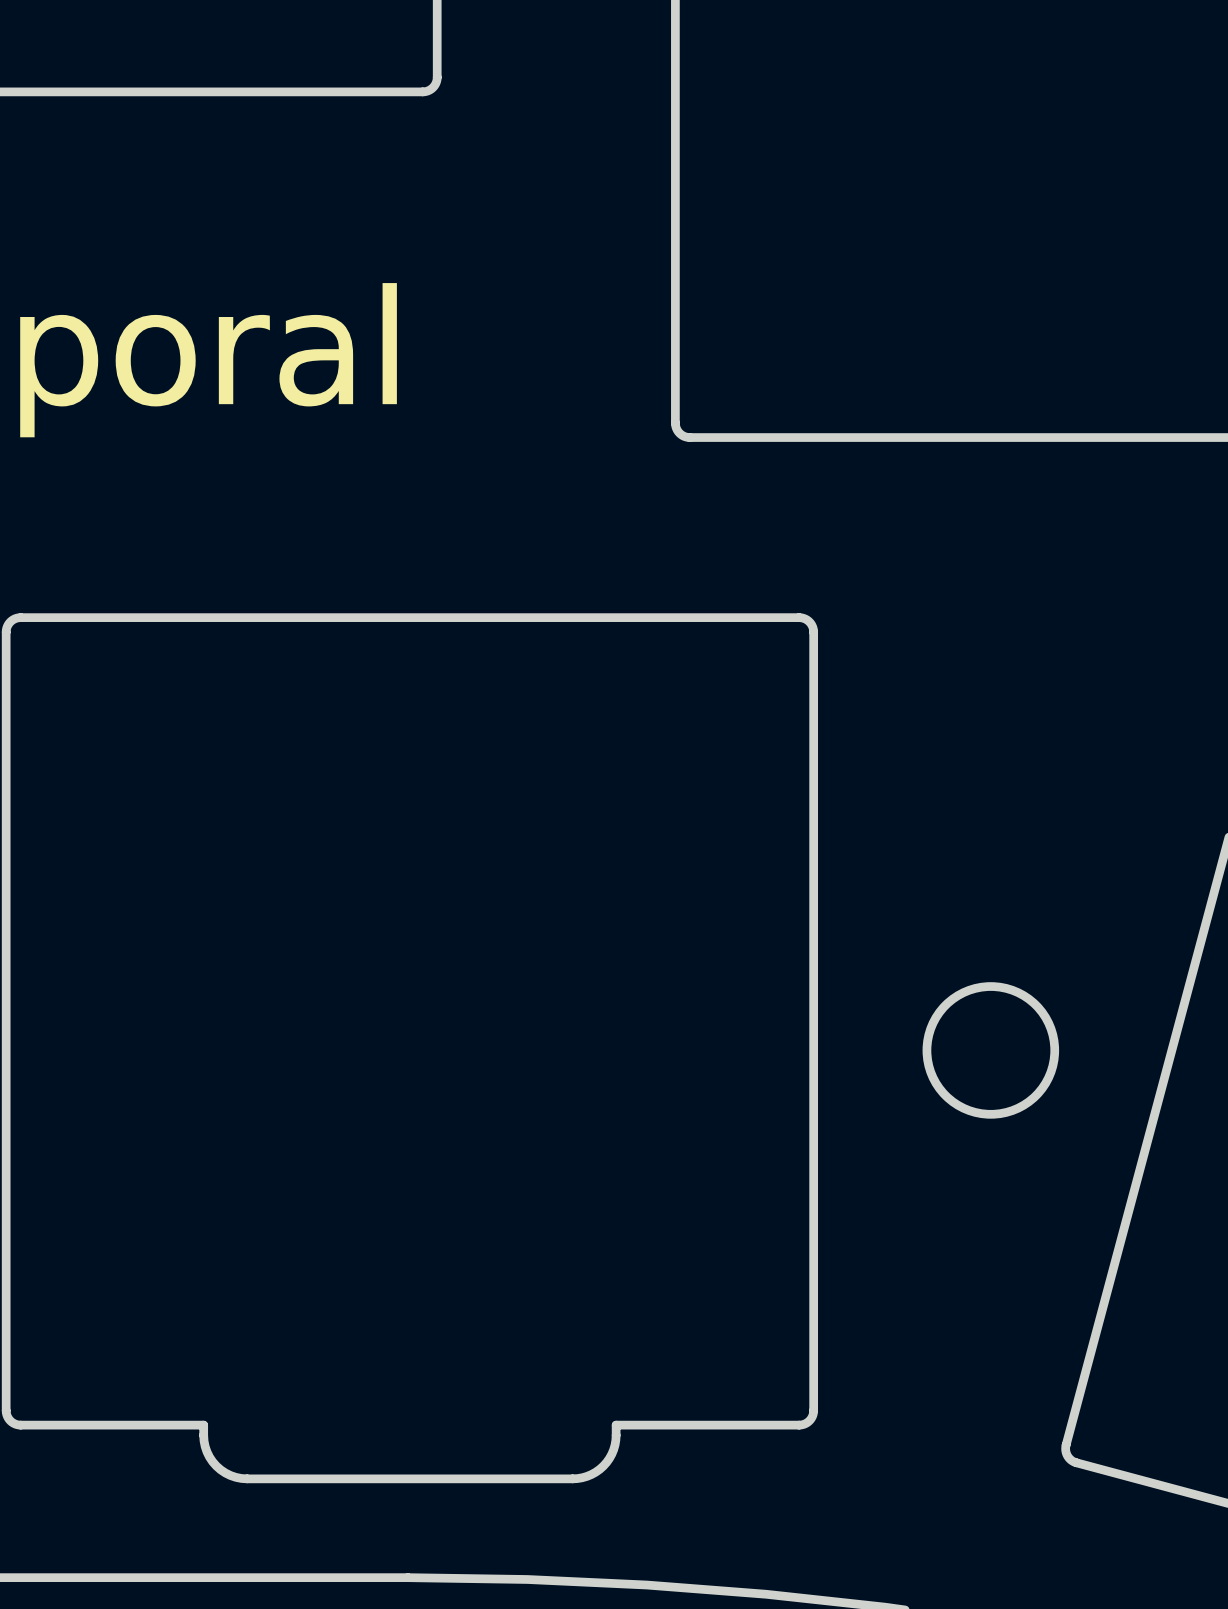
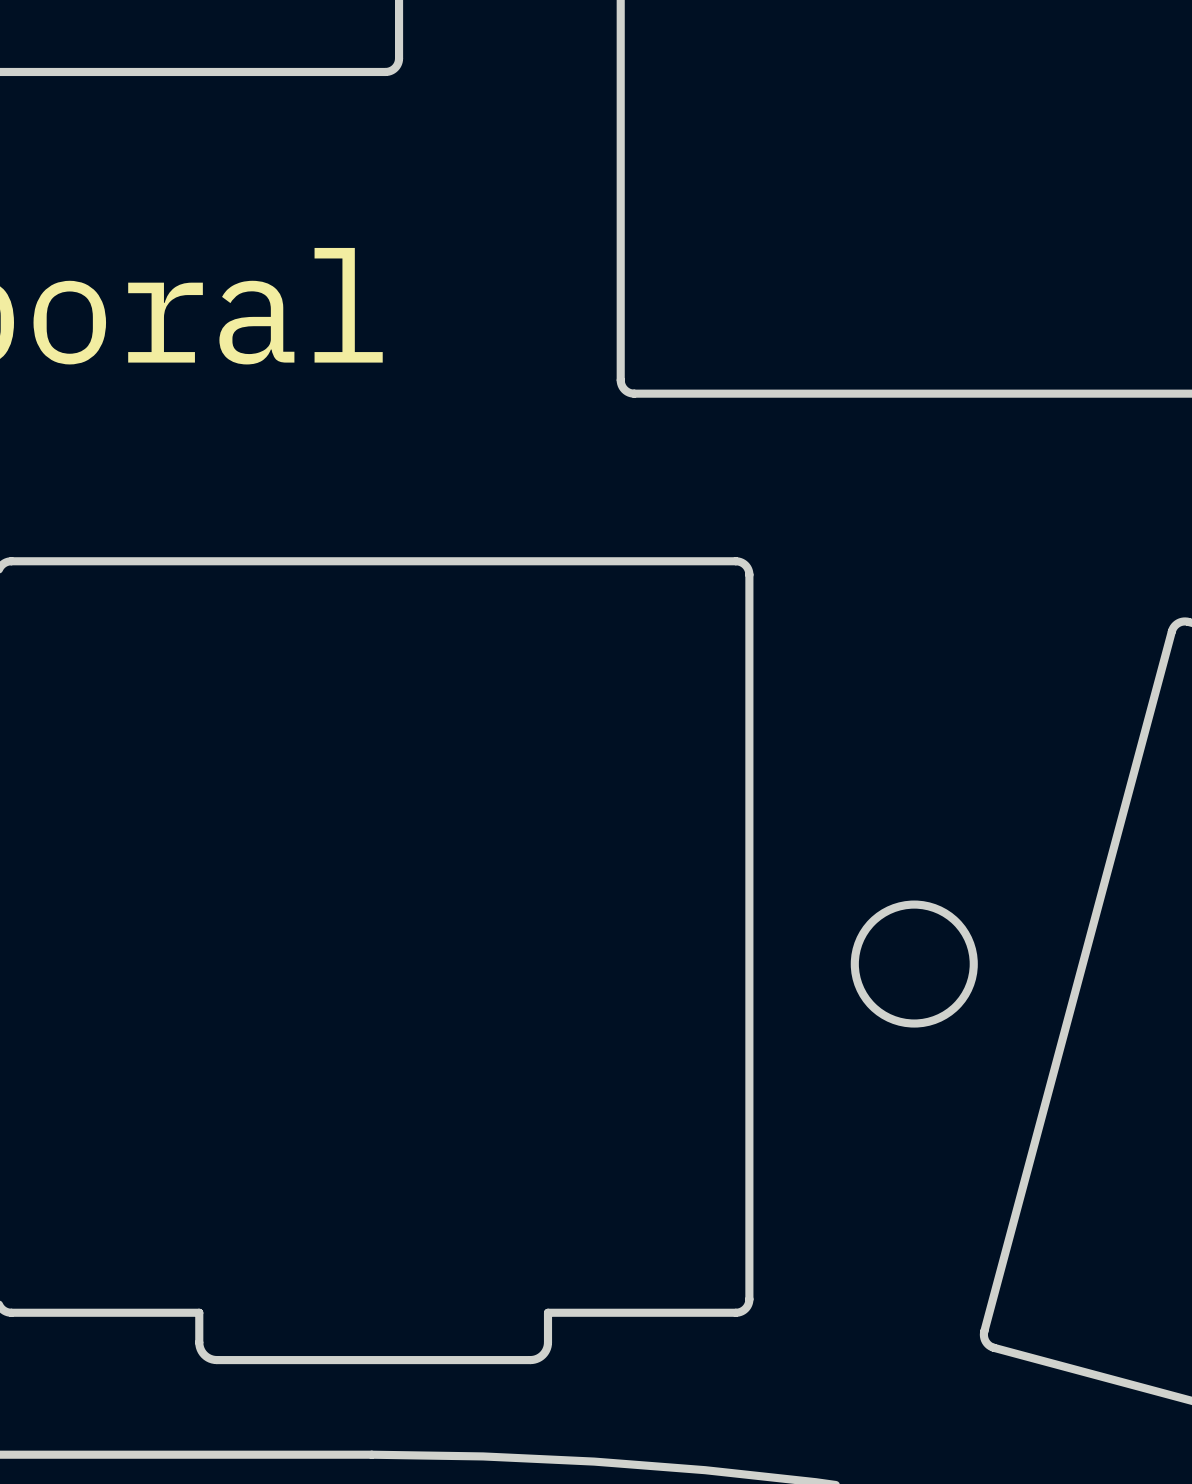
board edge: (203, 1425) (205, 1446) (212, 1461) (230, 1475) (247, 1478) (577, 1478) (591, 1474) (606, 1462) (615, 1444) (616, 1425) -> (181, 1312) (199, 1312) (200, 1349) (206, 1356) (216, 1360) (532, 1359) (541, 1356) (547, 1348) (548, 1312) (565, 1312)

